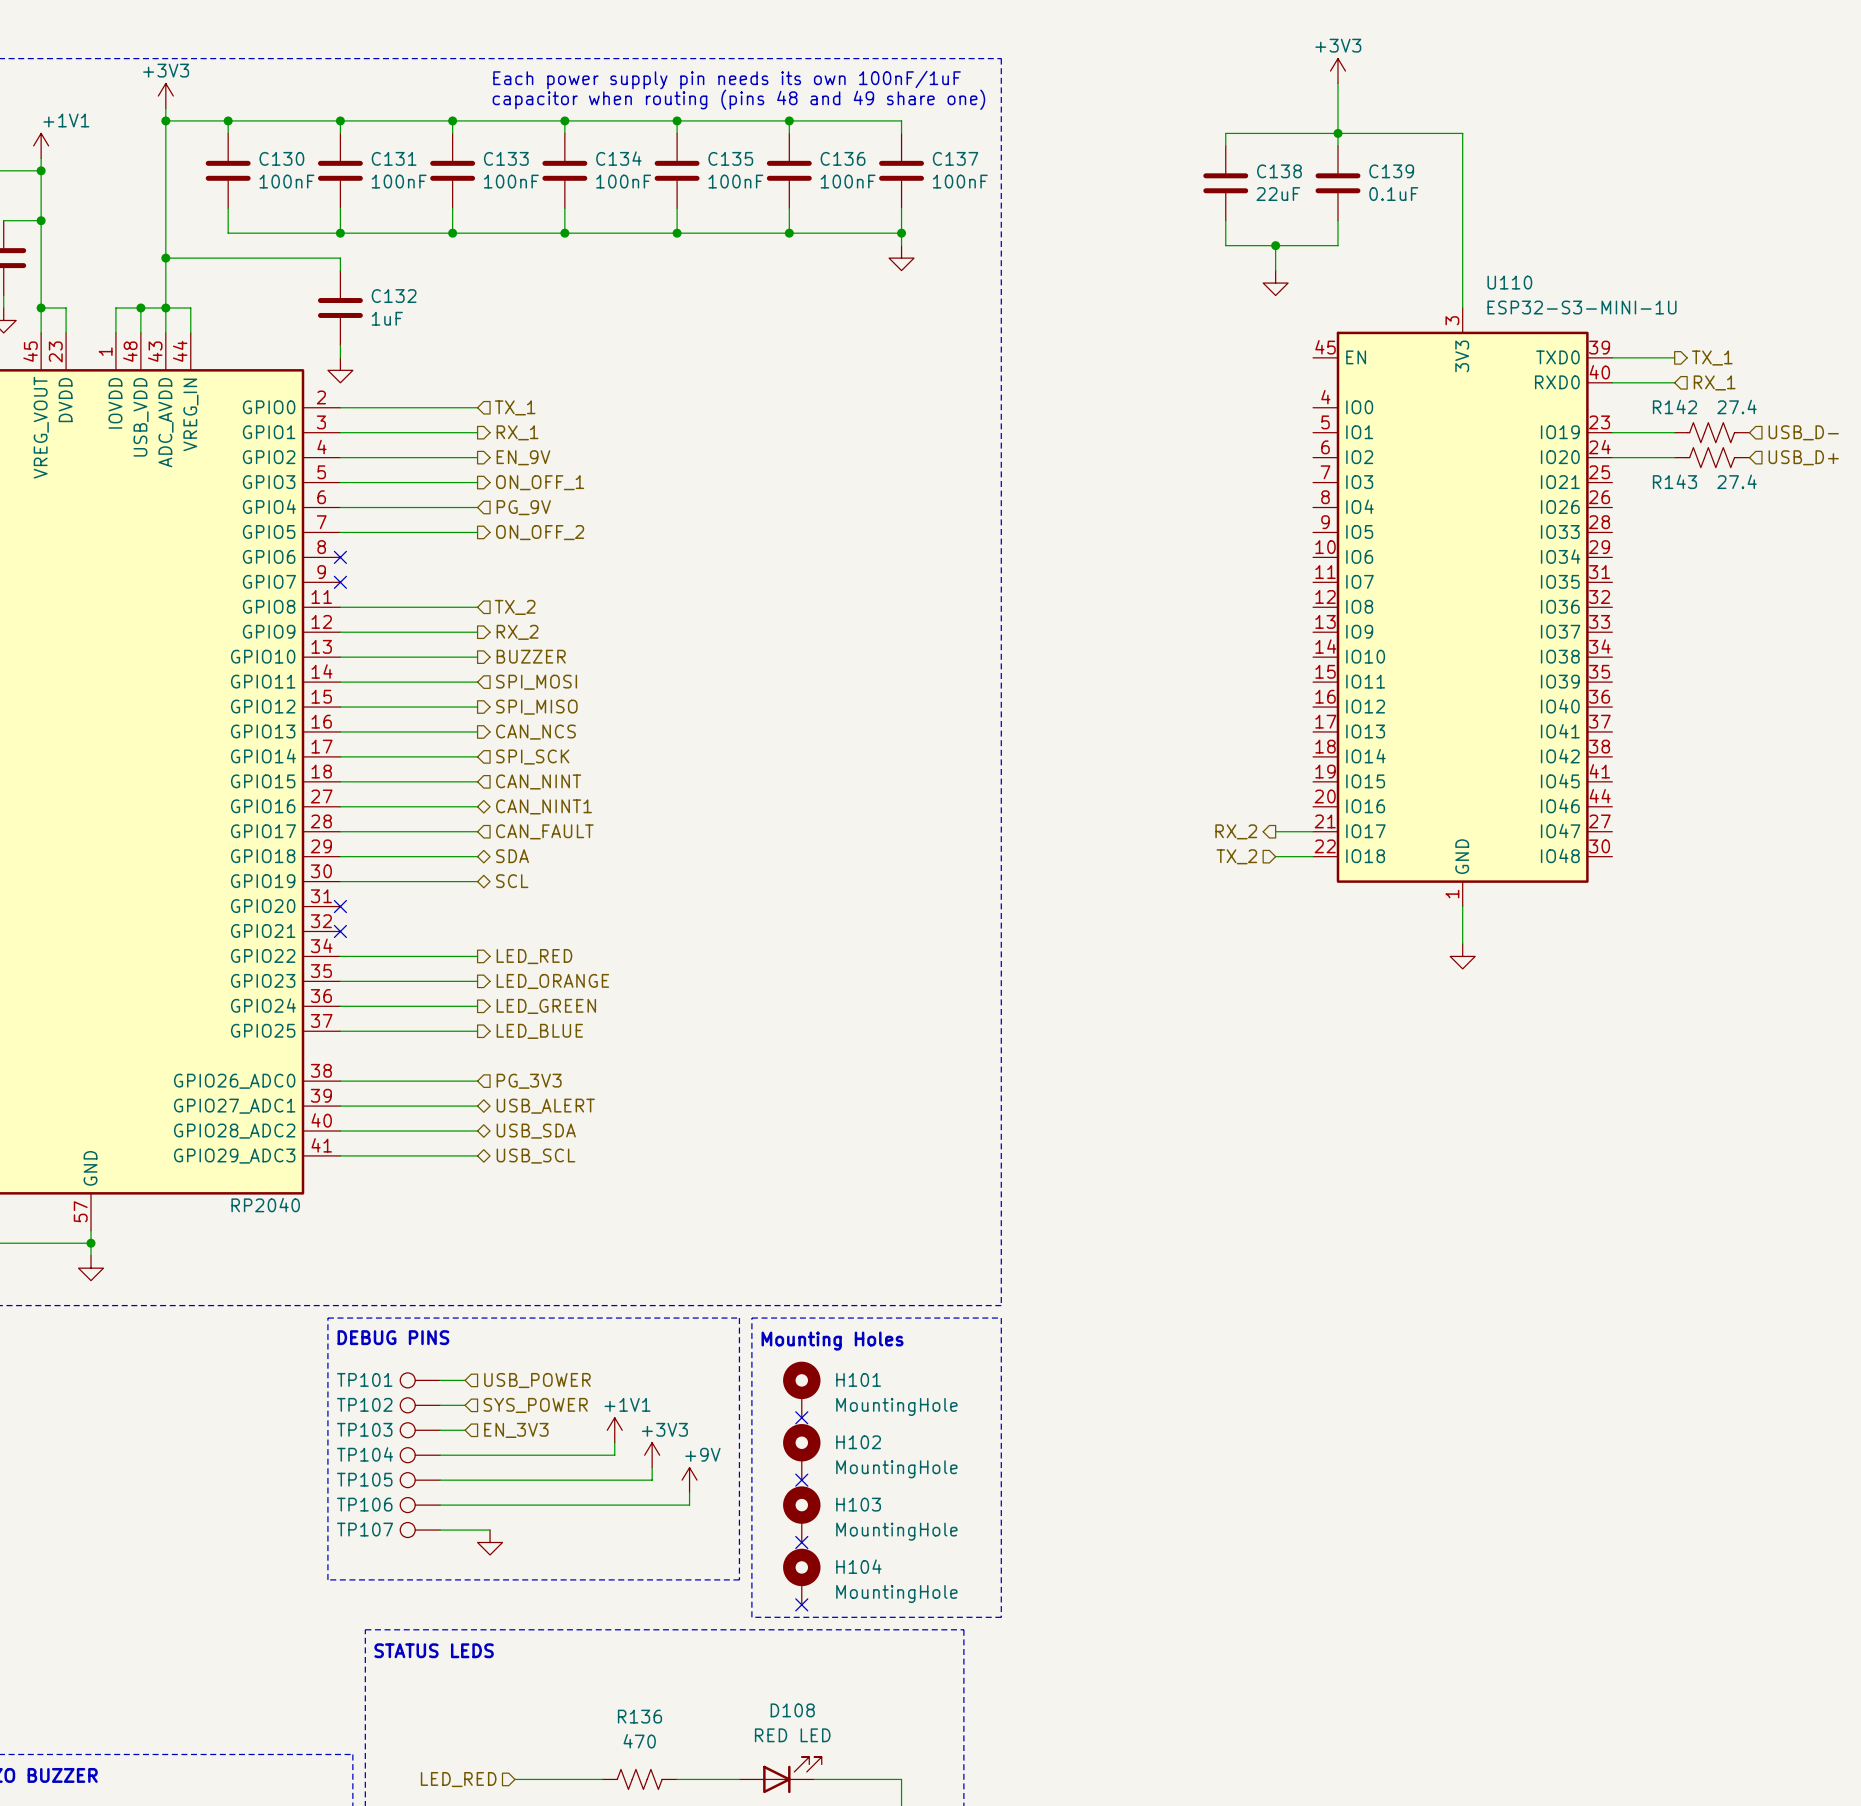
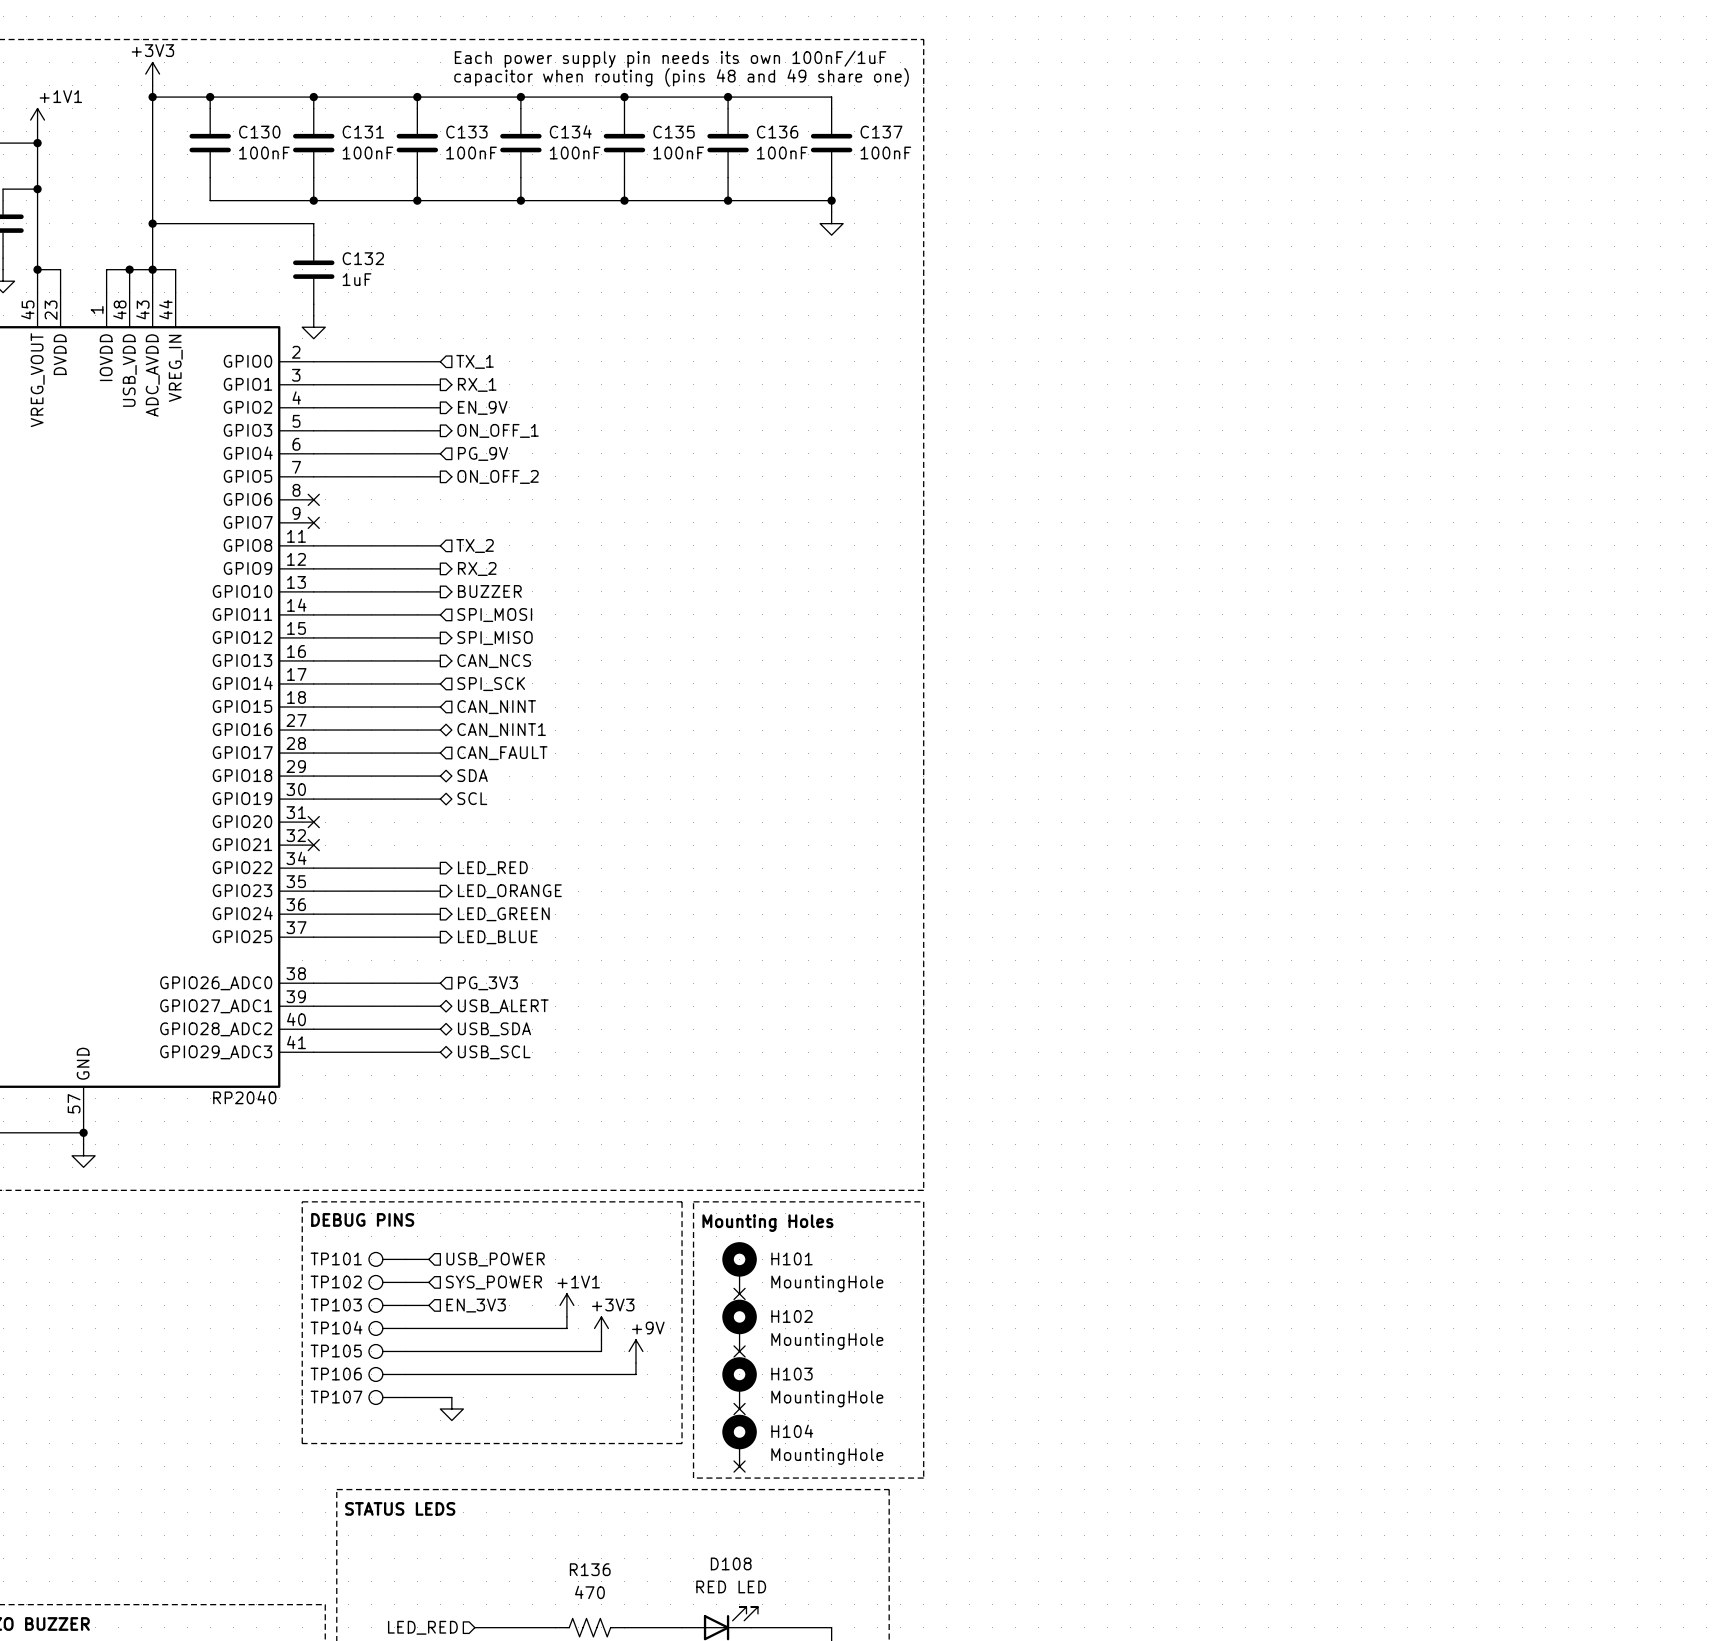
power symbol: +3V3 (1337, 71) -> none
wire: (1337, 83) (1337, 145) -> none
junction: (1337, 133) -> none
wire: (1225, 145) (1225, 133) (1462, 133) (1462, 307) -> none
C138: 22uF (1225, 183) -> none
C139: 0.1uF (1337, 183) -> none
wire: (1225, 220) (1225, 245) (1337, 245) (1337, 220) -> none
wire: (1275, 245) (1275, 270) -> none
junction: (1275, 245) -> none
power symbol: (1275, 283) -> none
wire: (1612, 357) (1674, 357) -> none
hierarchical label: TX_1 (1712, 358) -> none
wire: (1612, 382) (1674, 382) -> none
hierarchical label: RX_1 (1714, 382) -> none
wire: (1612, 432) (1674, 432) -> none
R142: 27.4 (1712, 432) -> none
hierarchical label: USB_D- (1803, 432) -> none
wire: (1612, 457) (1674, 457) -> none
R143: 27.4 (1712, 457) -> none
hierarchical label: USB_D+ (1803, 457) -> none
U110: ESP32-S3-MINI-1U (1462, 607) -> none
hierarchical label: RX_2 (1236, 831) -> none
wire: (1275, 831) (1313, 831) -> none
hierarchical label: TX_2 (1236, 856) -> none
wire: (1275, 856) (1313, 856) -> none
wire: (1462, 906) (1462, 943) -> none
power symbol: (1462, 956) -> none

